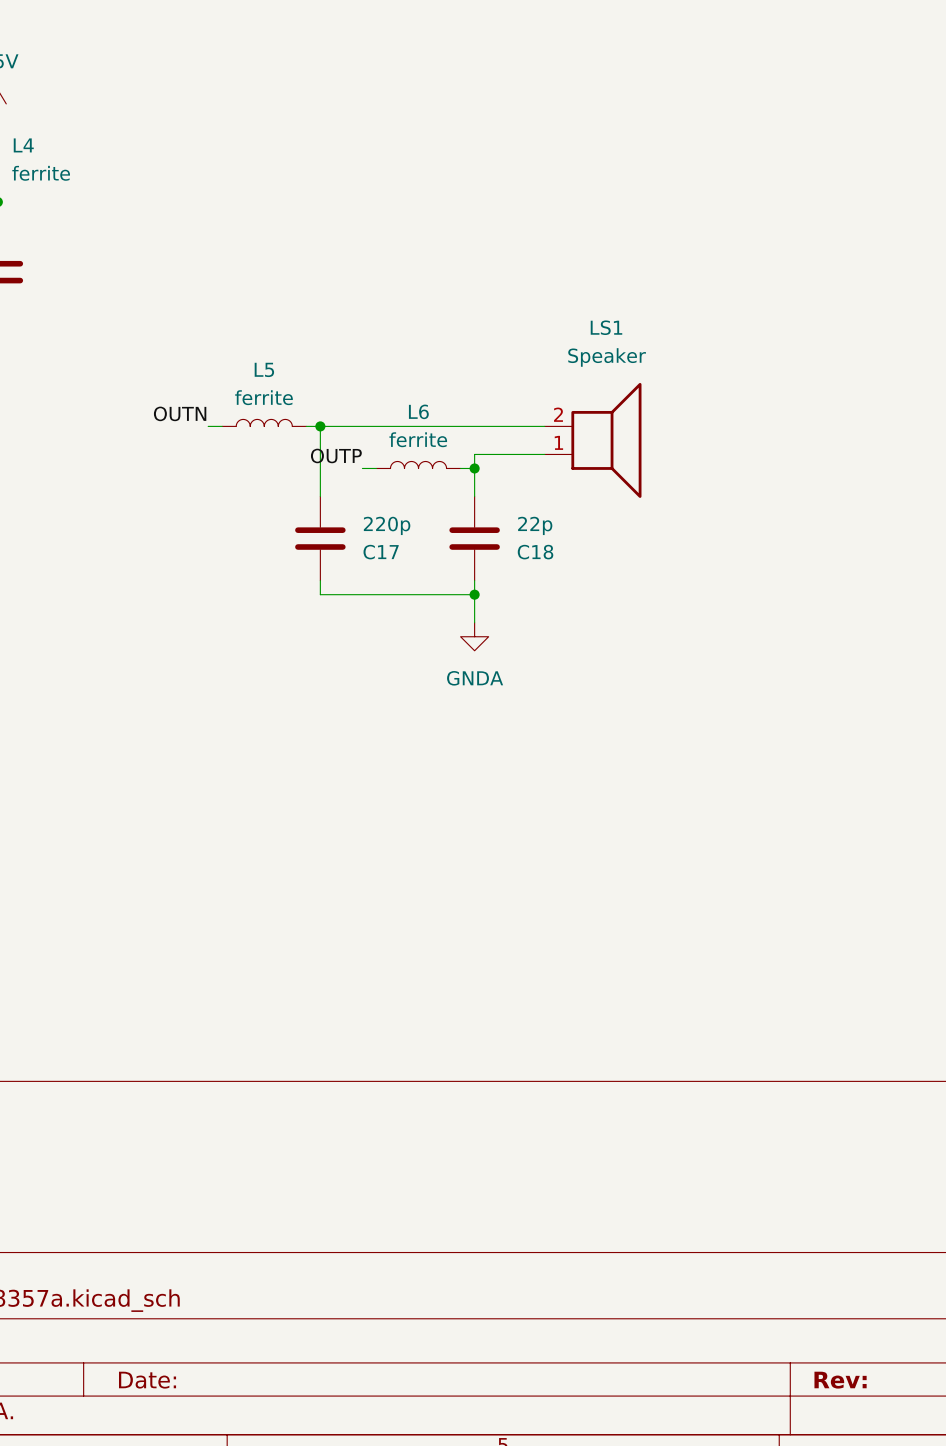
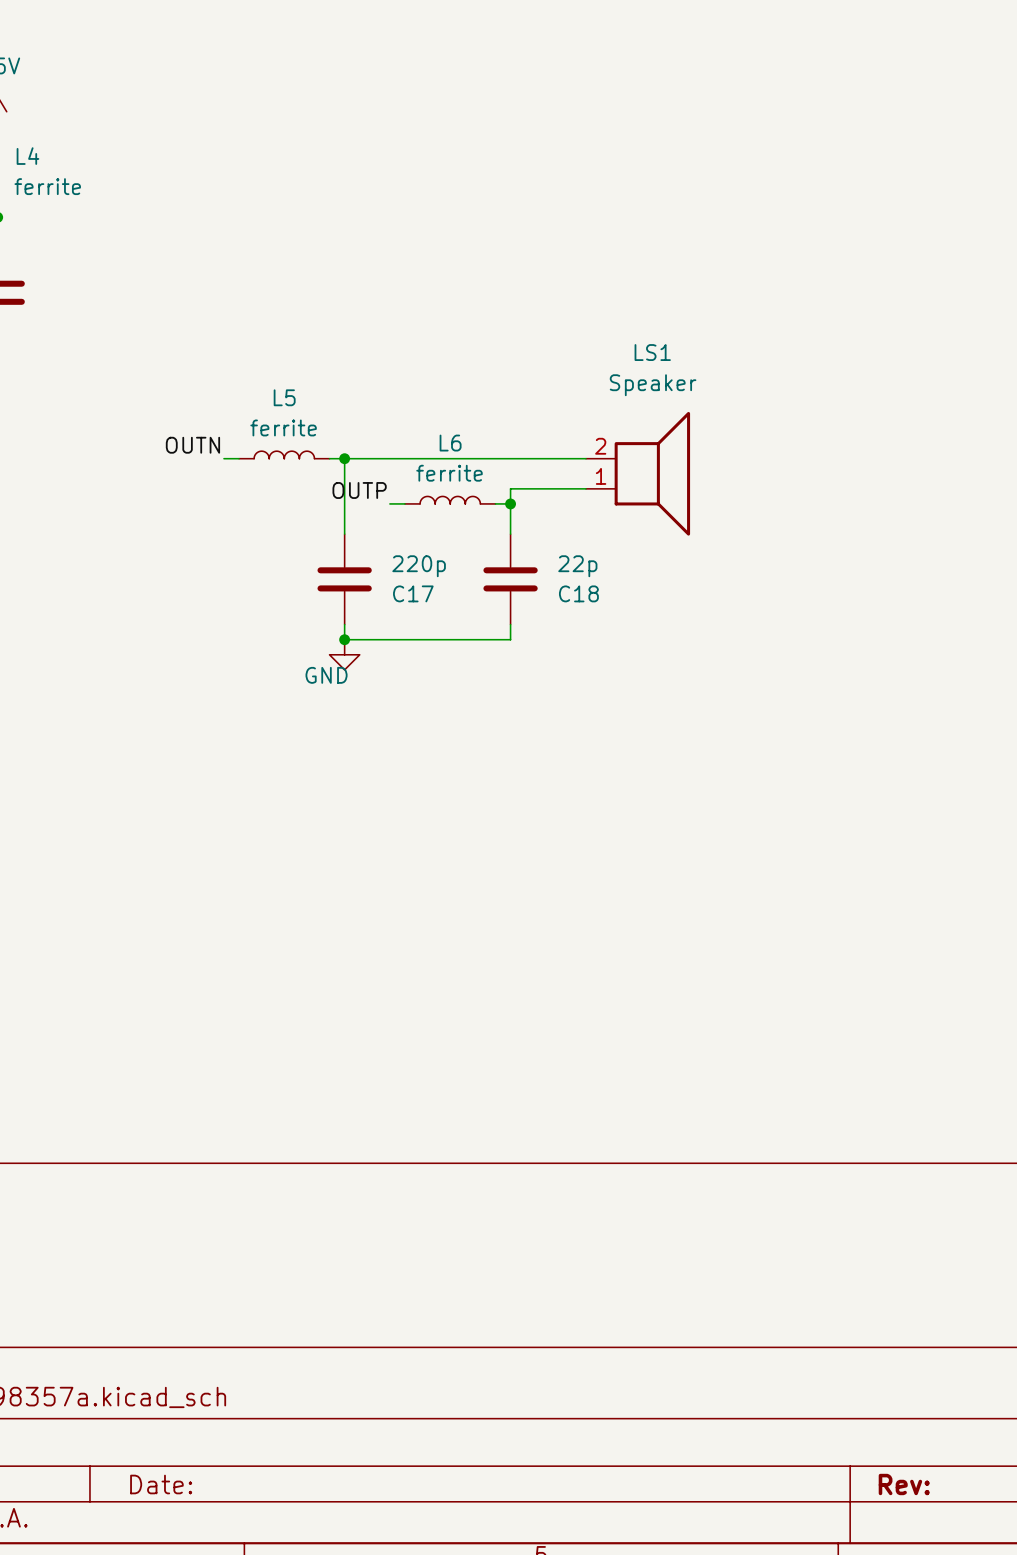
junction: none -> (344, 639)
wire: (474, 594) (474, 622) -> none
junction: (474, 594) -> none
power symbol: none -> GND (344, 654)
power symbol: GNDA (474, 636) -> none

